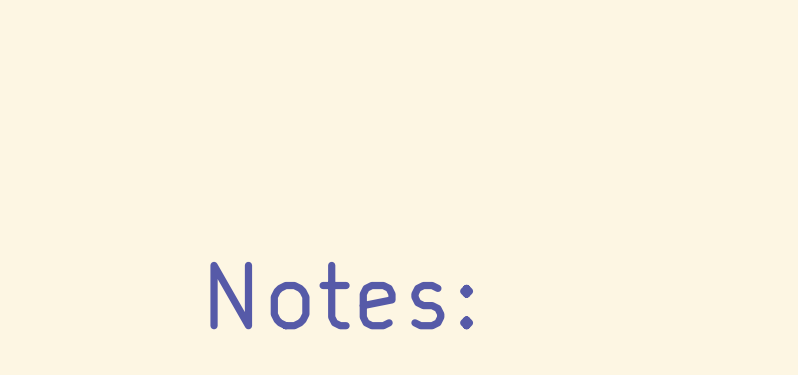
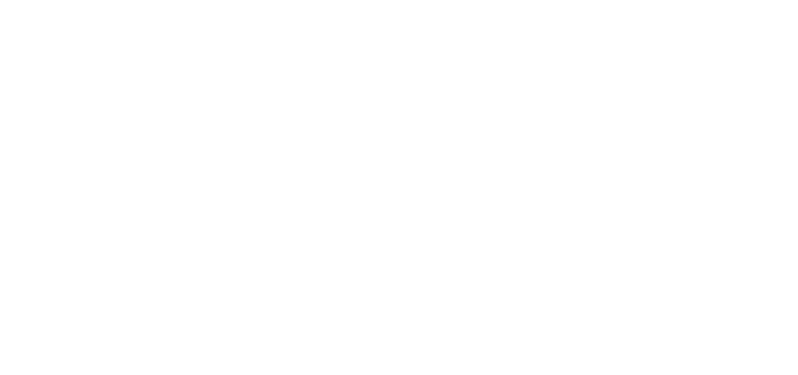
text: Notes: (341, 295) -> none

